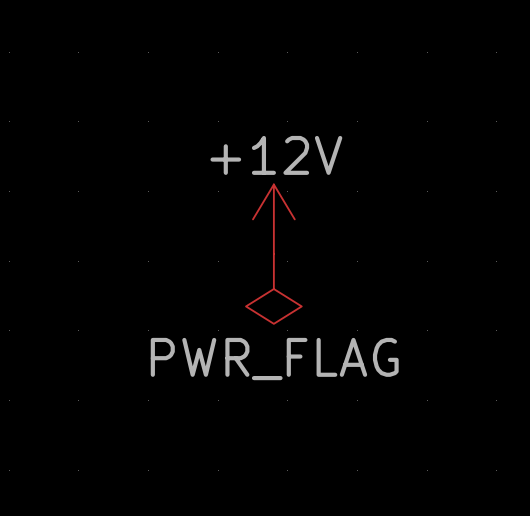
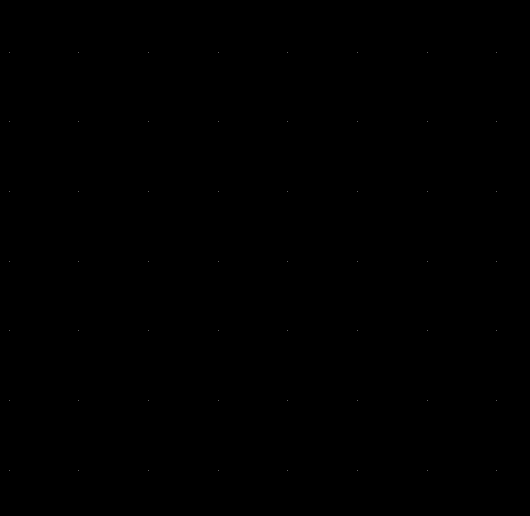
power symbol: +12V (273, 219) -> none
power symbol: PWR_FLAG (273, 289) -> none

